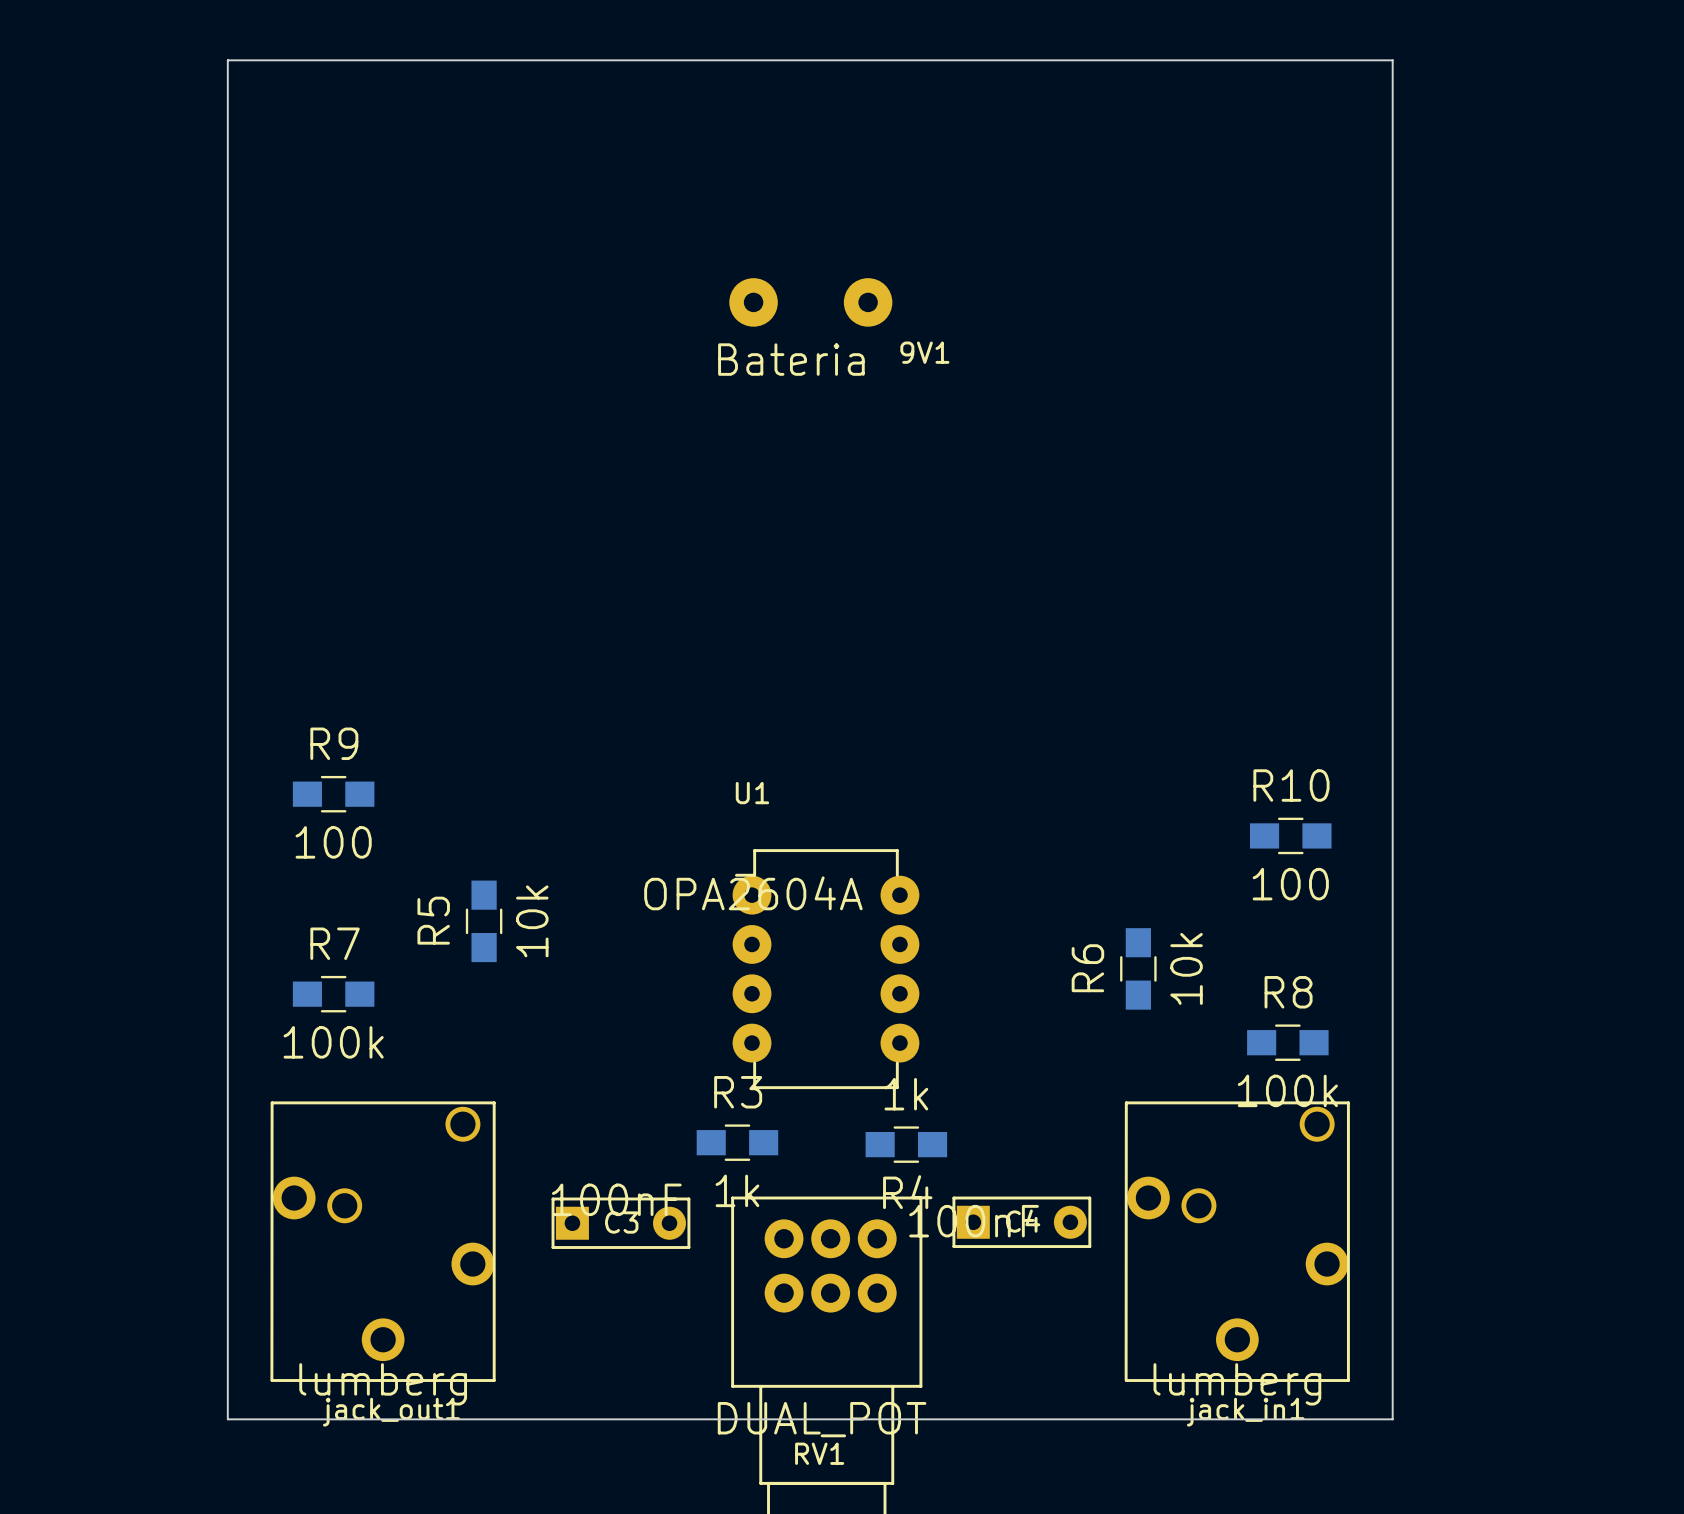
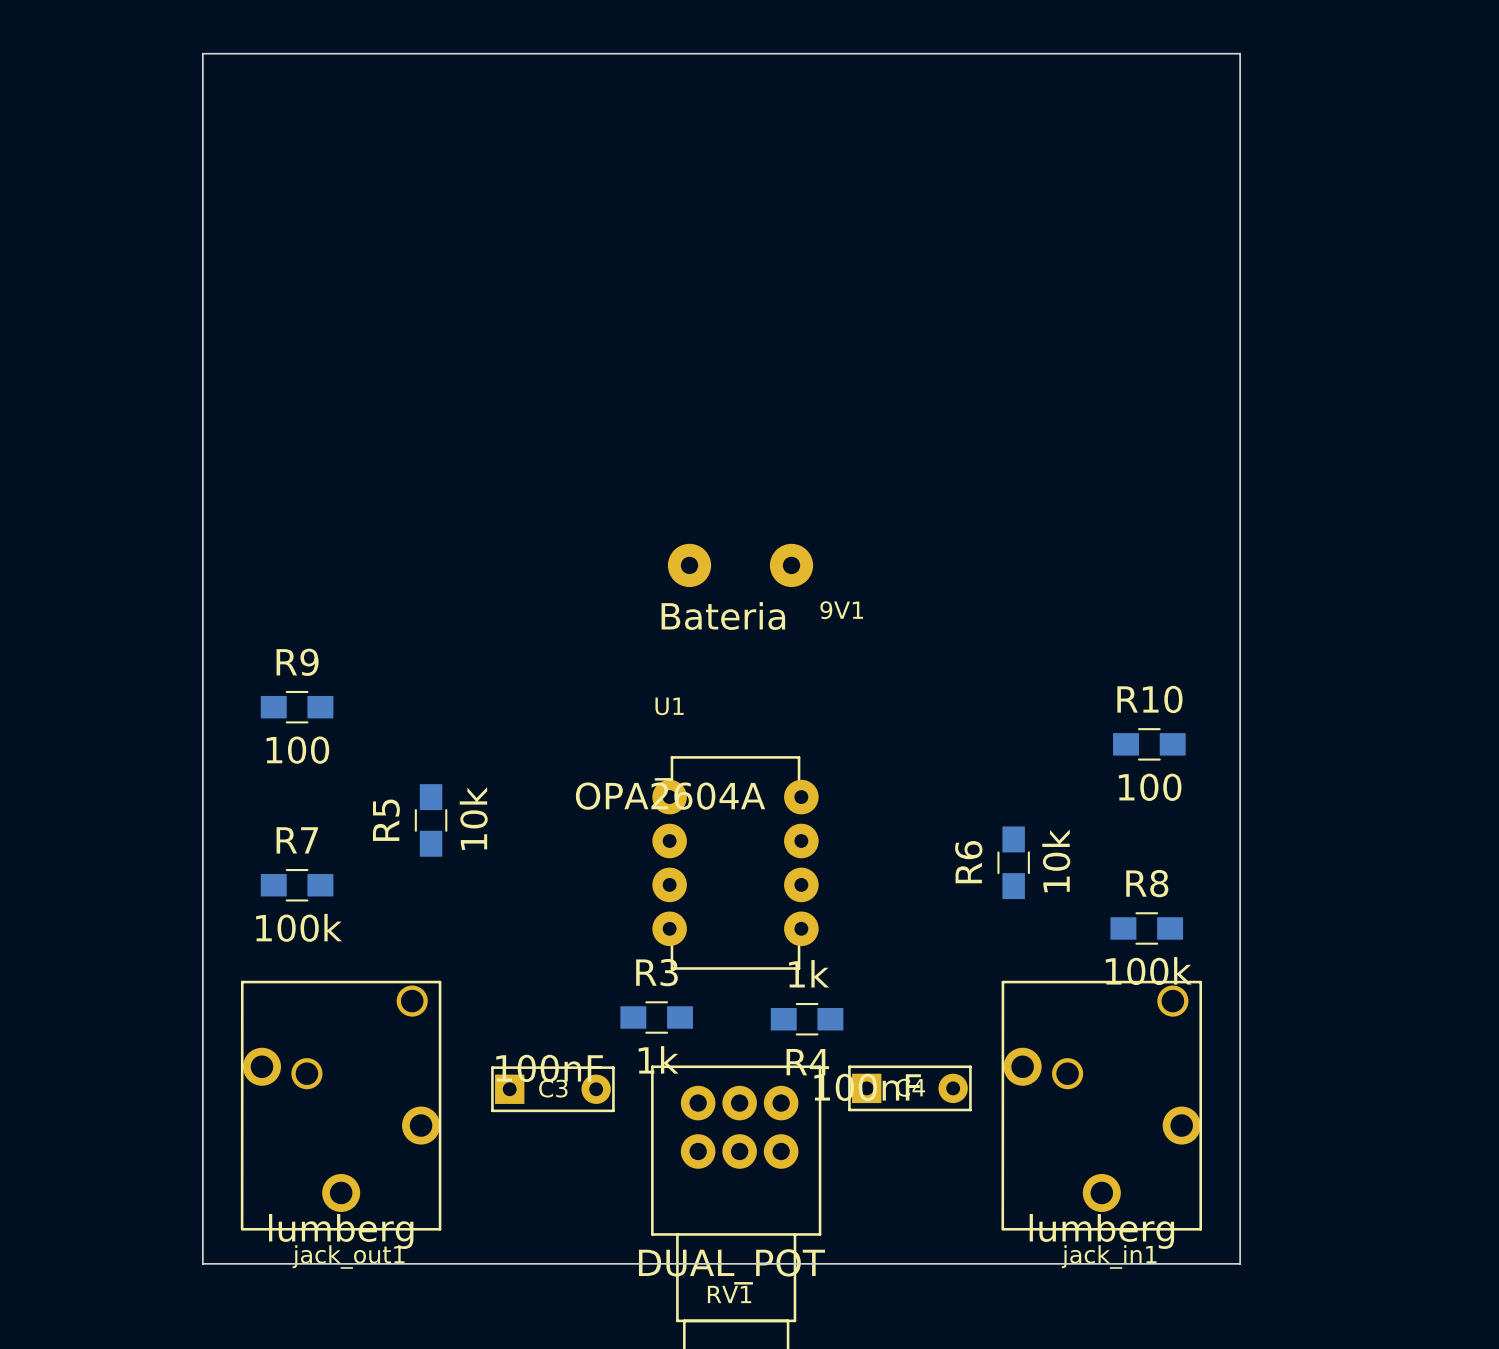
9V1 position: (810, 302) -> (740, 565)

